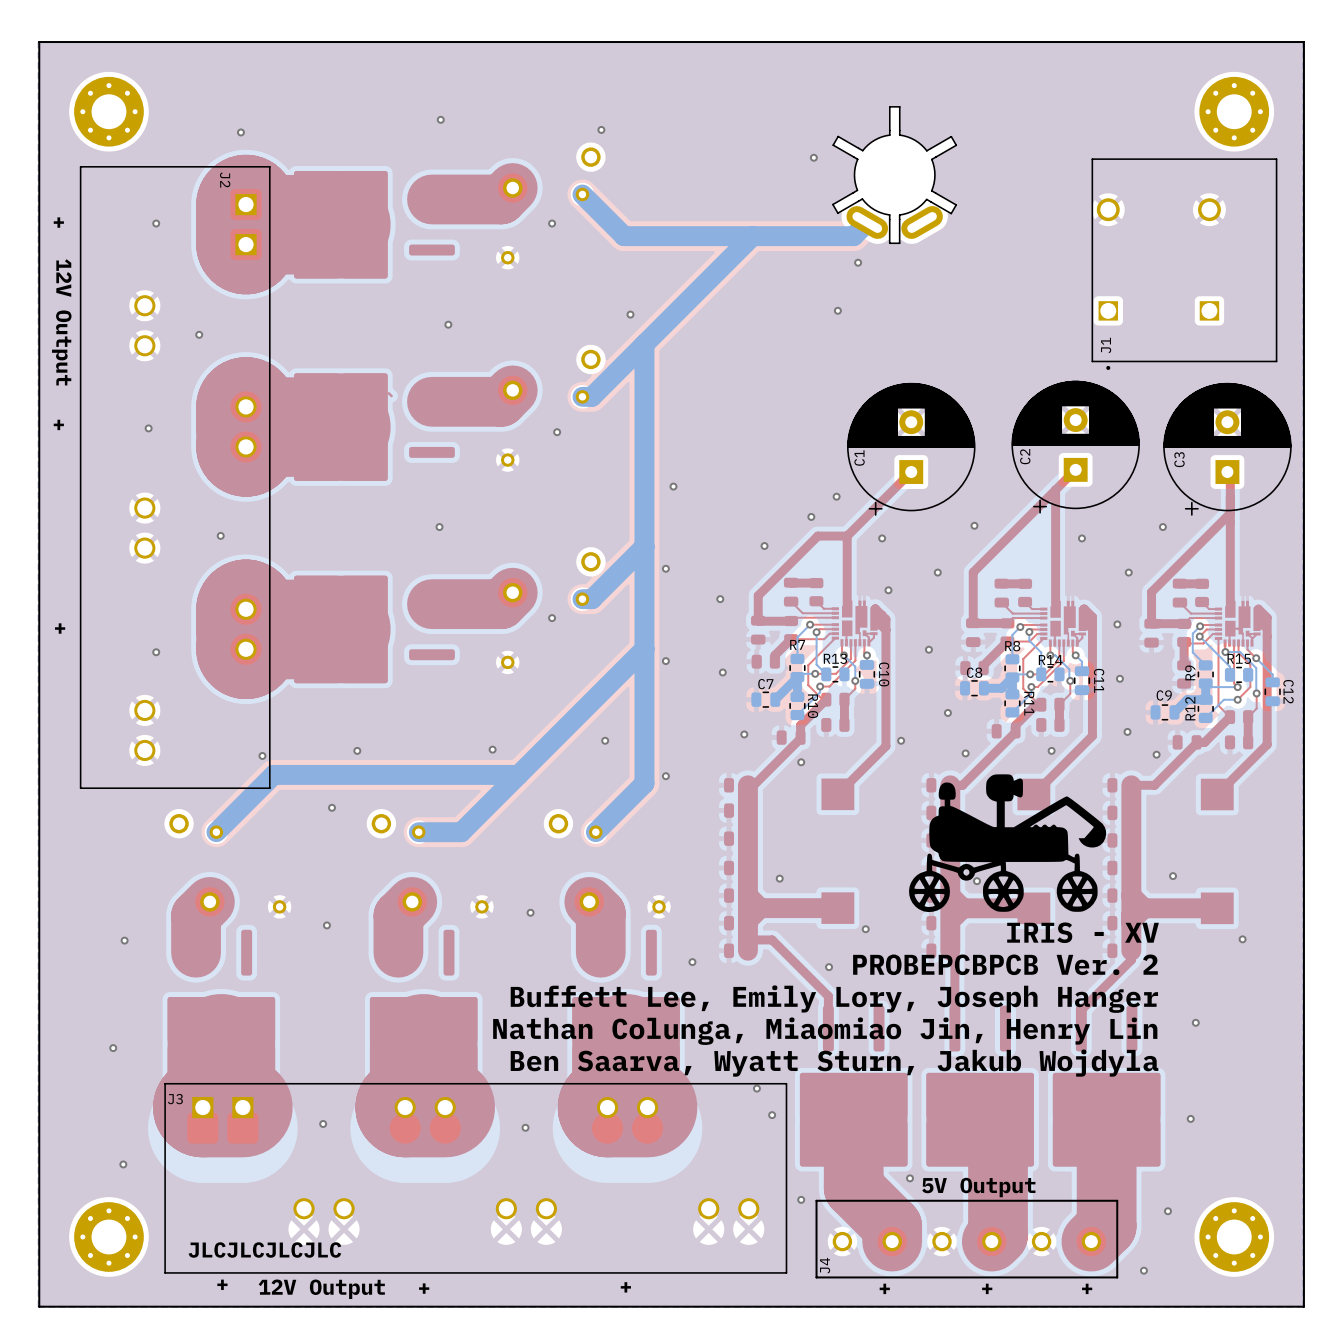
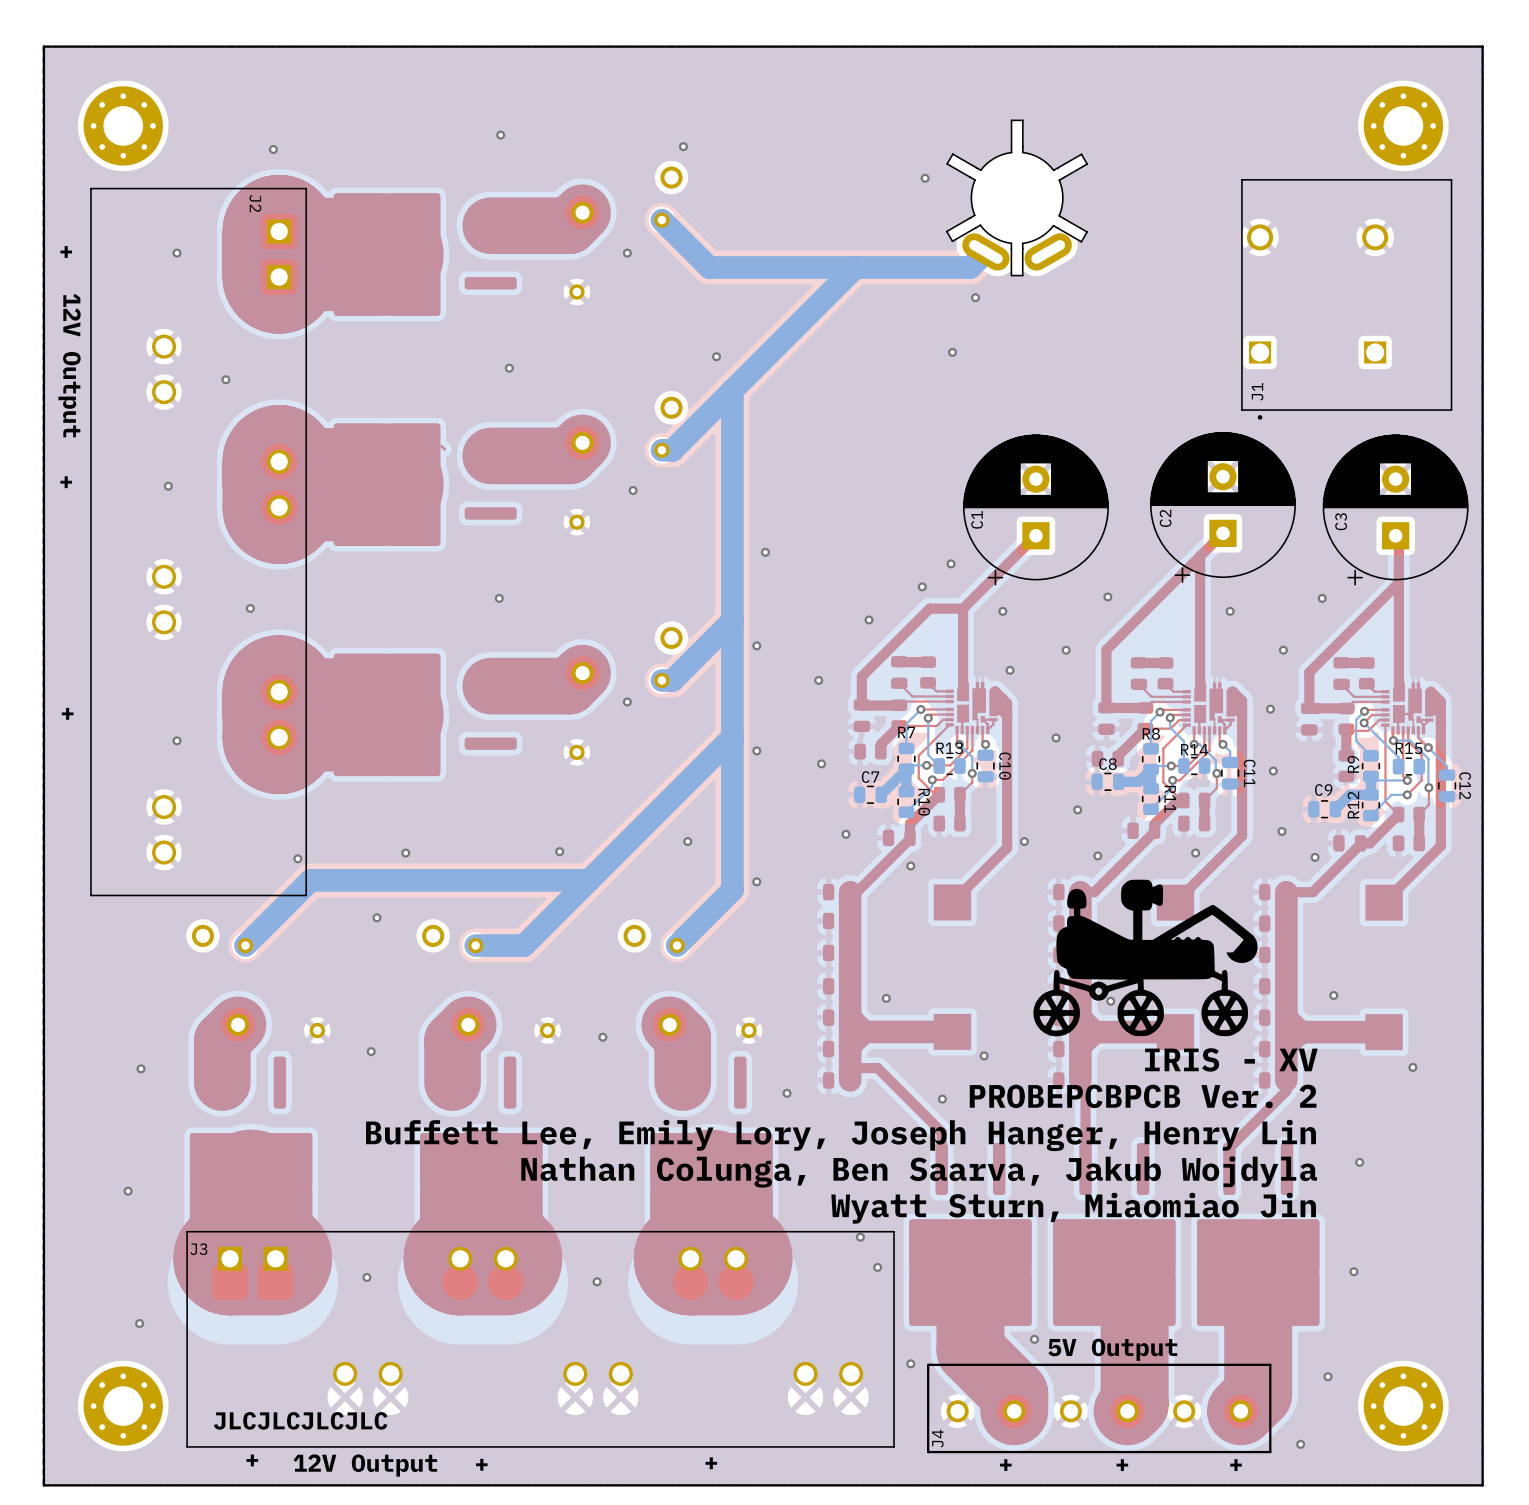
text: Buffett Lee, Emily Lory, Joseph Hanger (834, 999) -> Buffett Lee, Emily Lory, Joseph Hanger, Henry Lin (840, 1135)
text: Nathan Colunga, Miaomiao Jin, Henry Lin (825, 1031) -> Nathan Colunga, Ben Saarva, Jakub Wojdyla (919, 1171)
text: Ben Saarva, Wyatt Sturn, Jakub Wojdyla (834, 1063) -> Wyatt Sturn, Miaomiao Jin (1073, 1208)

